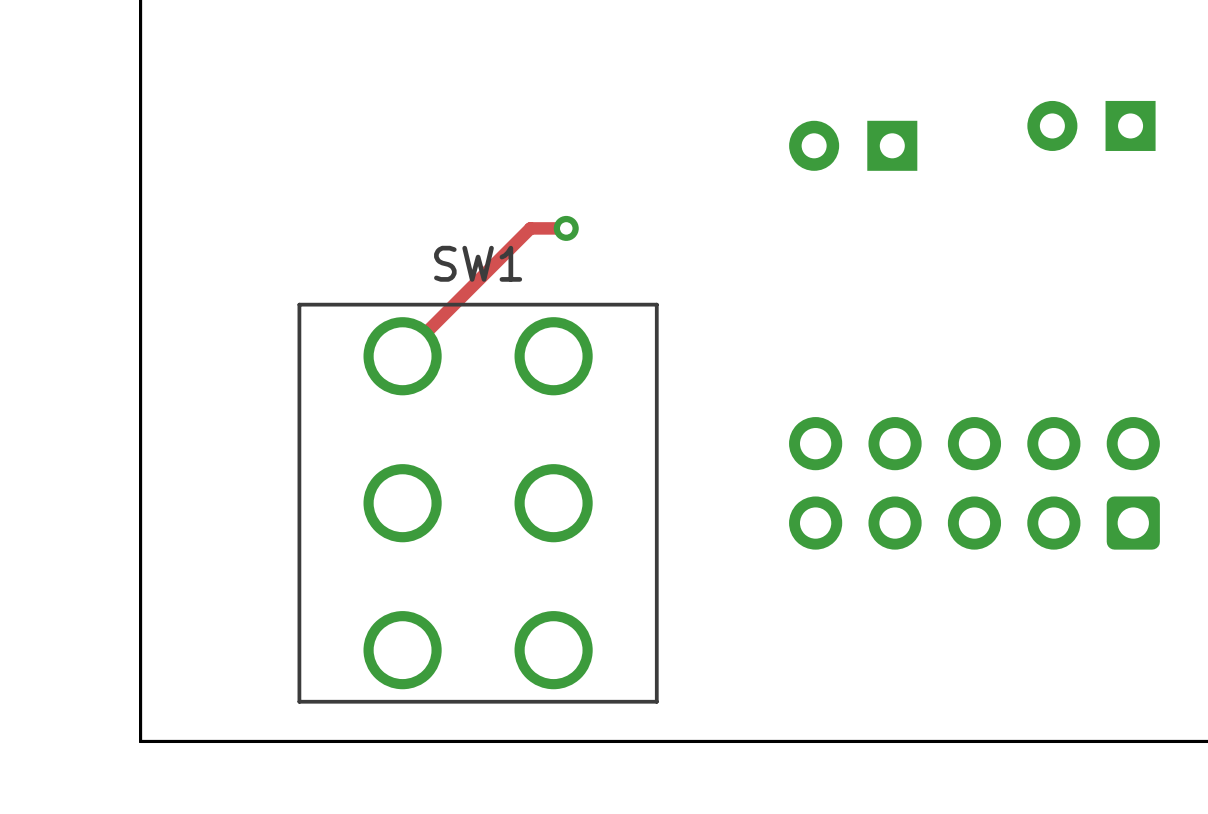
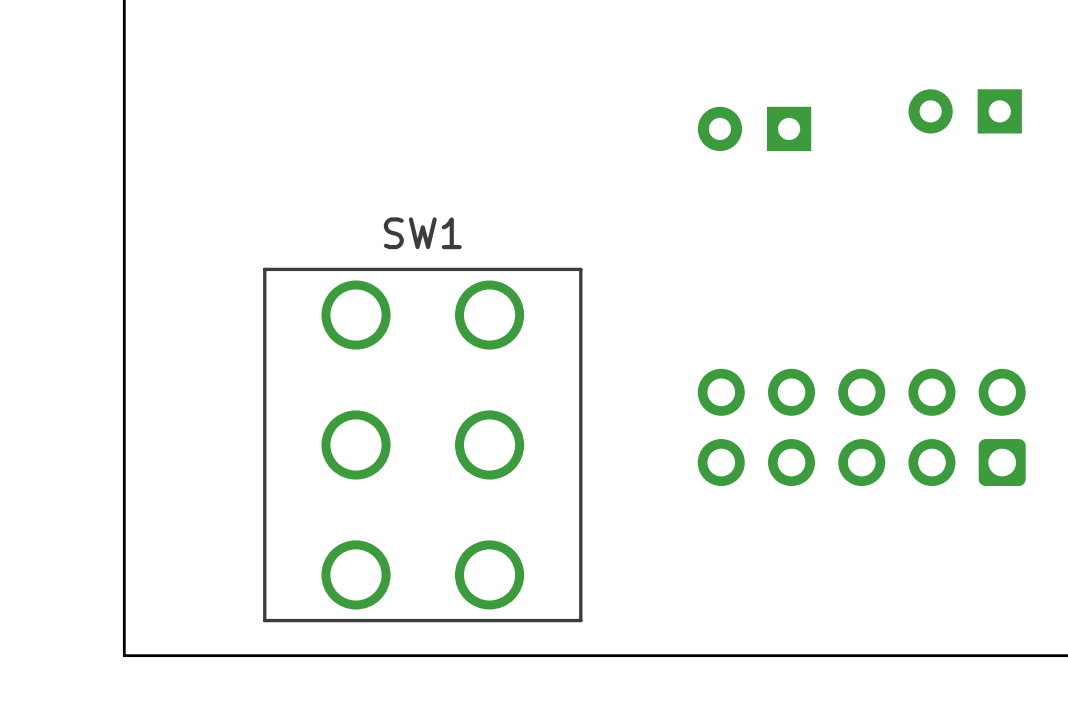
track: (566, 228) (530, 228) (402, 356) -> none
via: (566, 228) -> none

